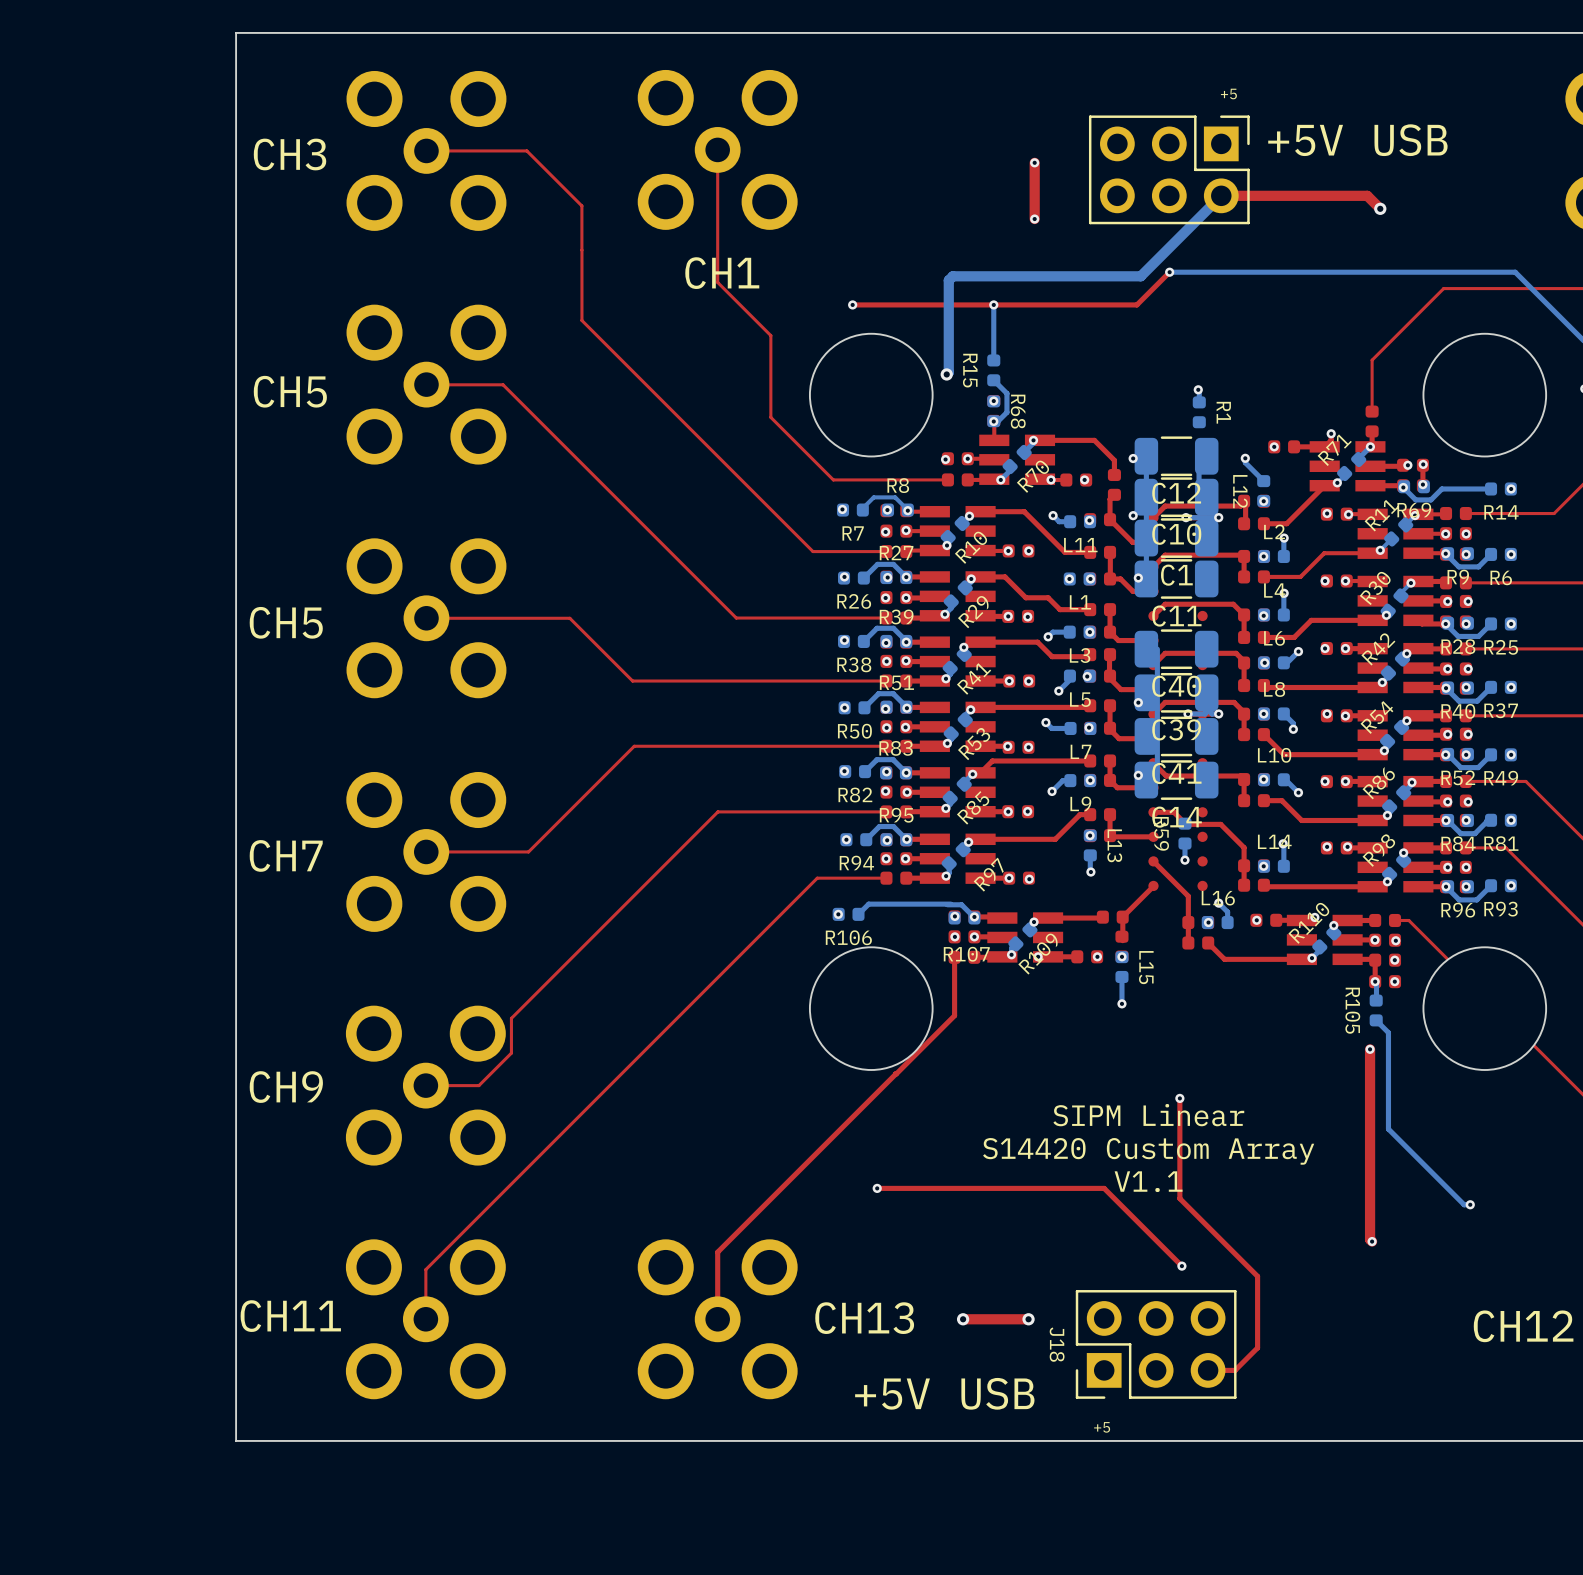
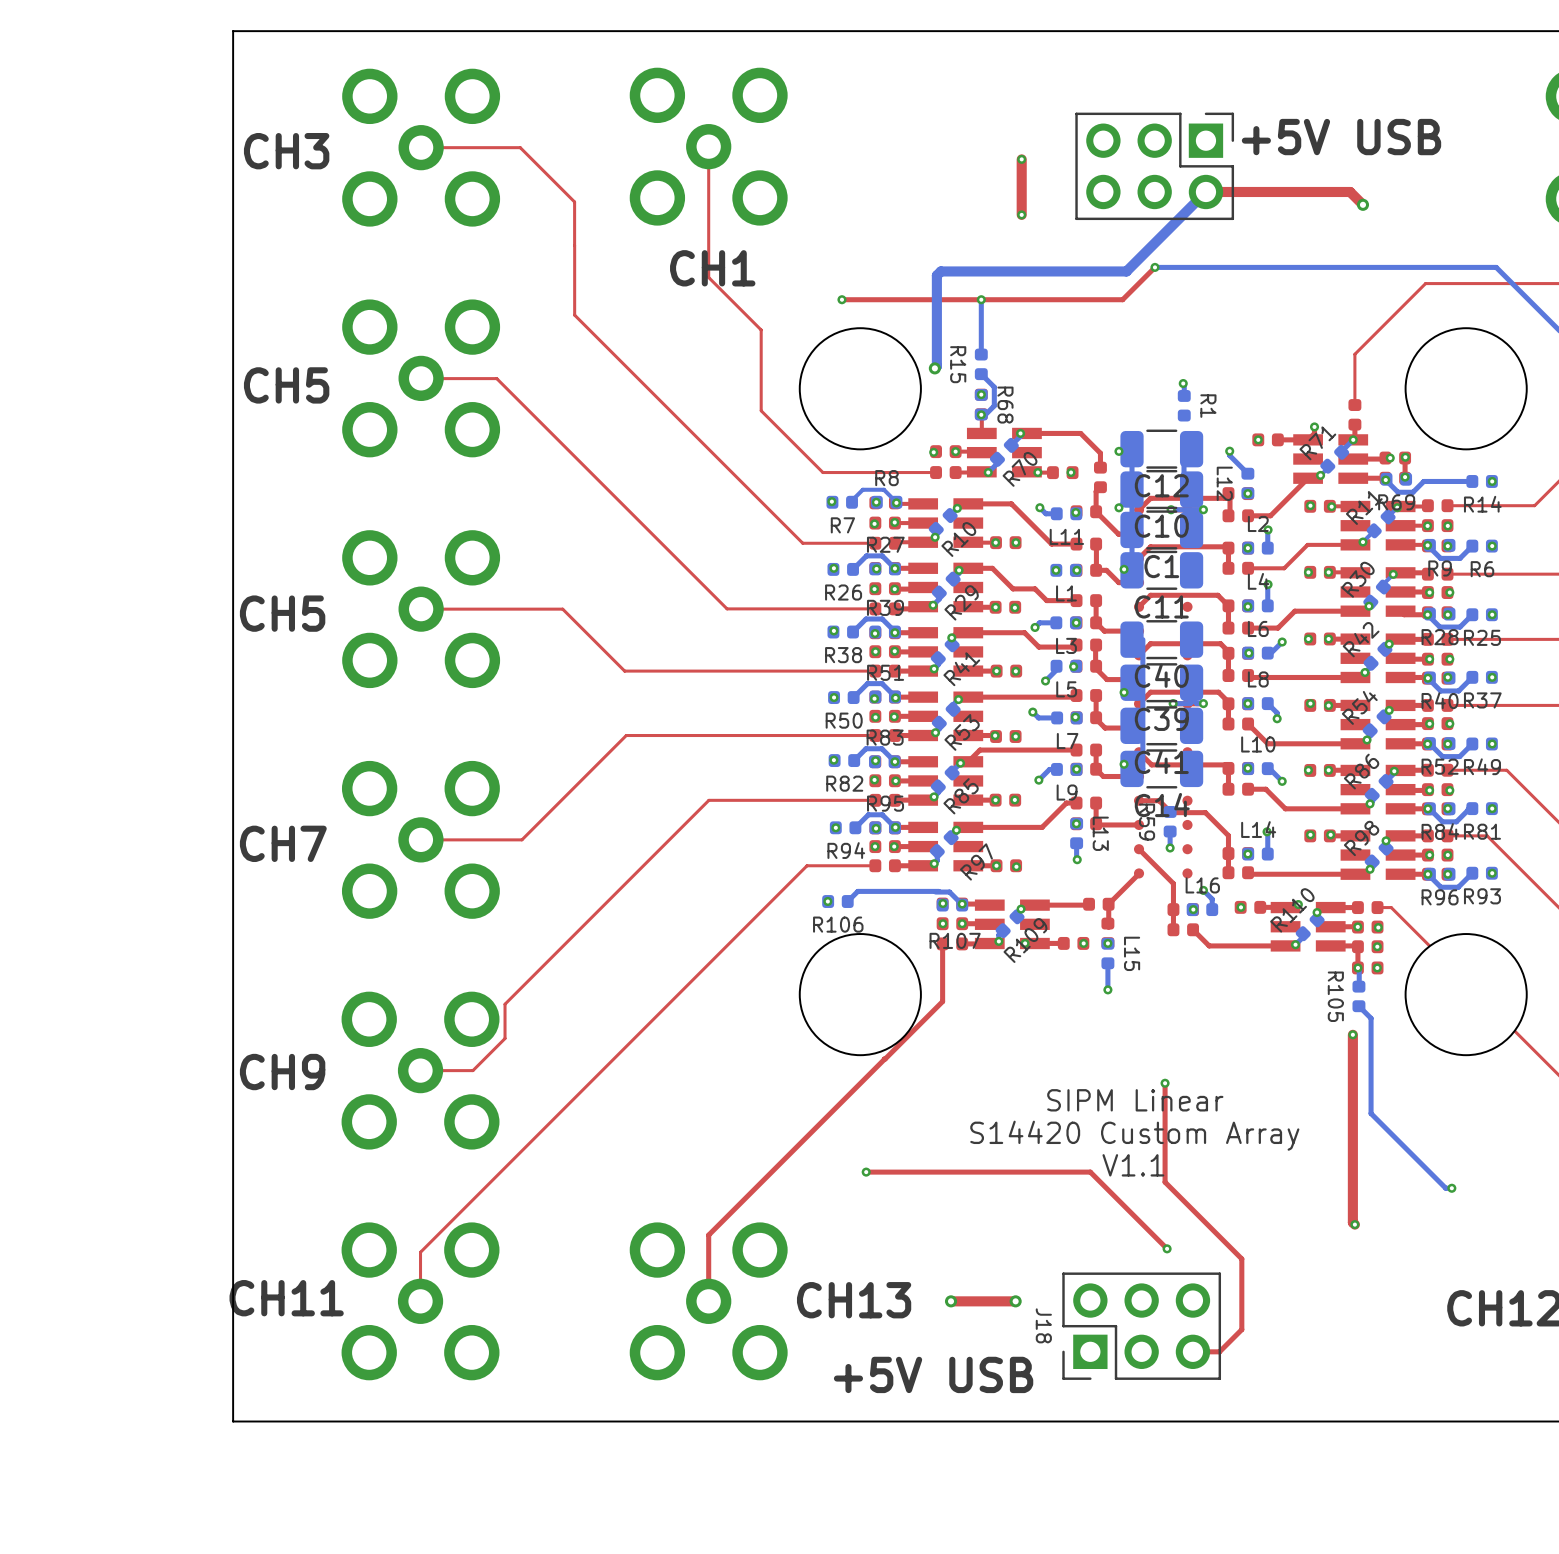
text: +5 (1228, 94) -> none
text: +5 (1102, 1427) -> none

